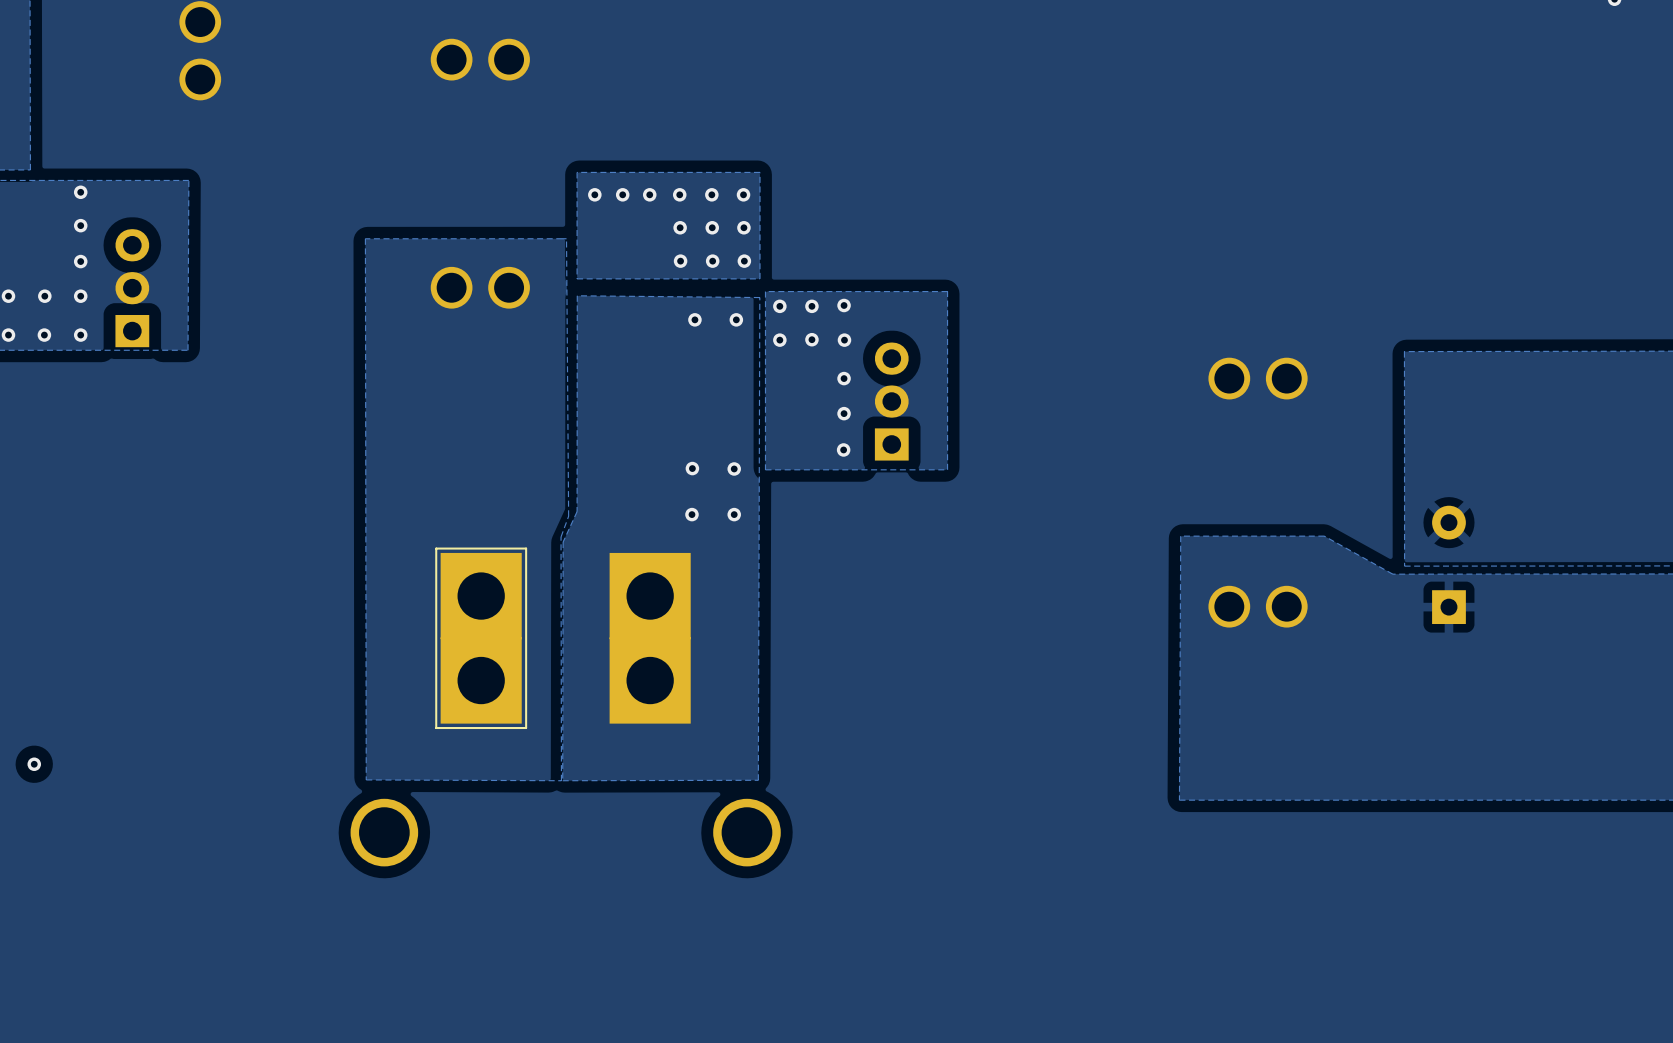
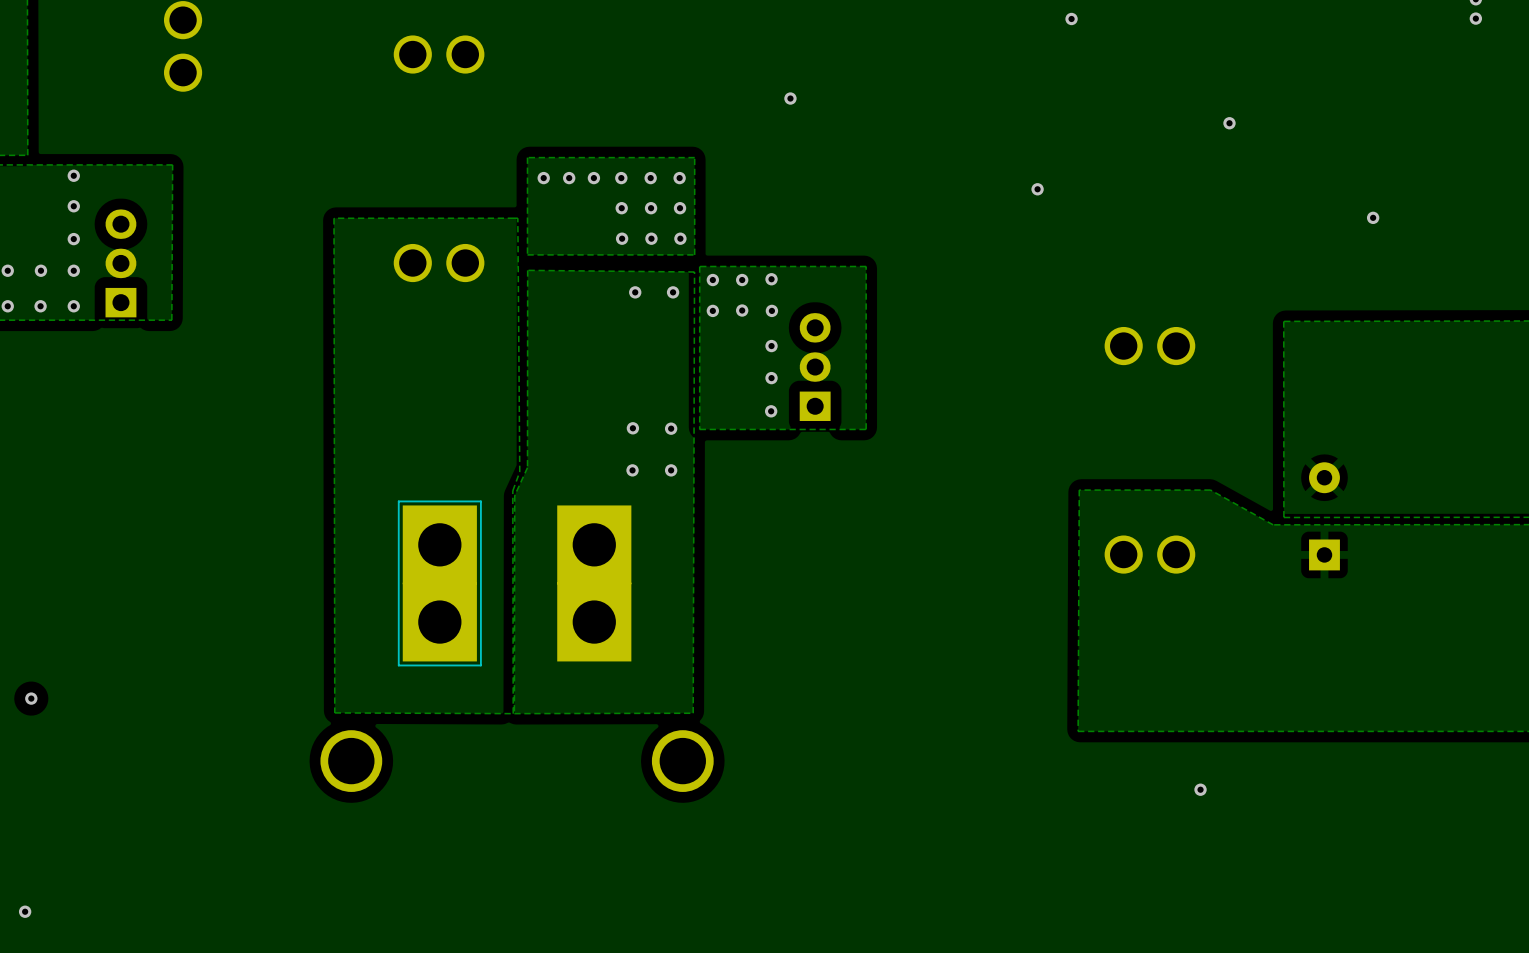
via: none -> (1071, 18)
via: none -> (1475, 18)
via: none -> (790, 98)
via: none -> (1229, 123)
via: none -> (1037, 189)
via: none -> (1373, 217)
via: none -> (1200, 789)
via: none -> (25, 911)

